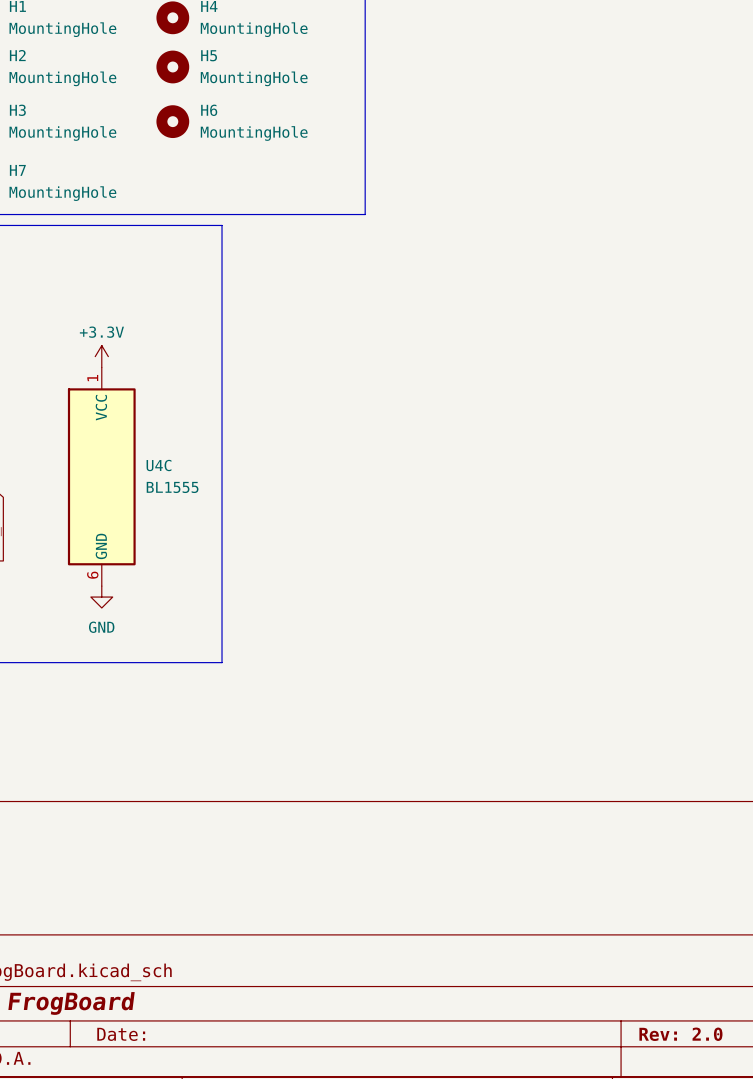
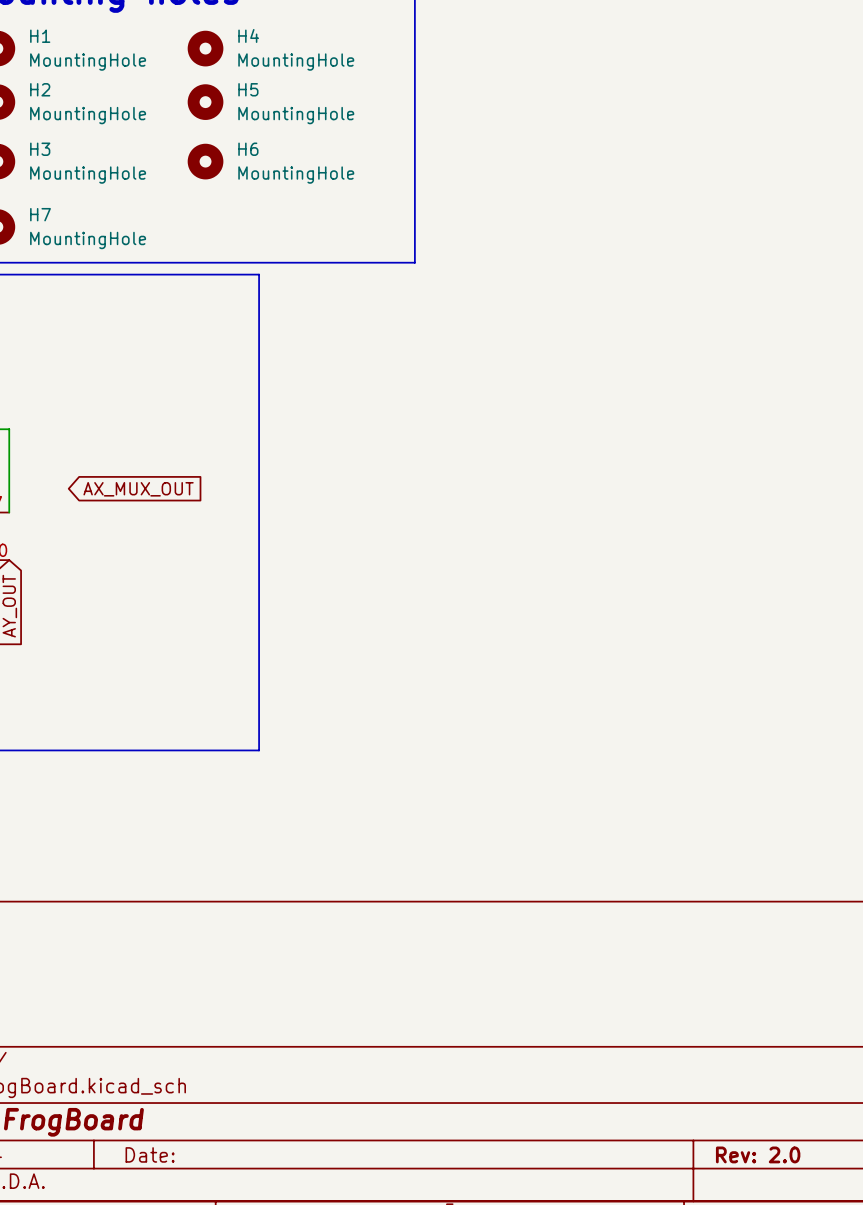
power symbol: +3.3V (101, 356) -> none
global label: none -> AX_MUX_OUT (138, 489)
U4C: BL1555 (101, 476) -> none
power symbol: GND (101, 597) -> none

